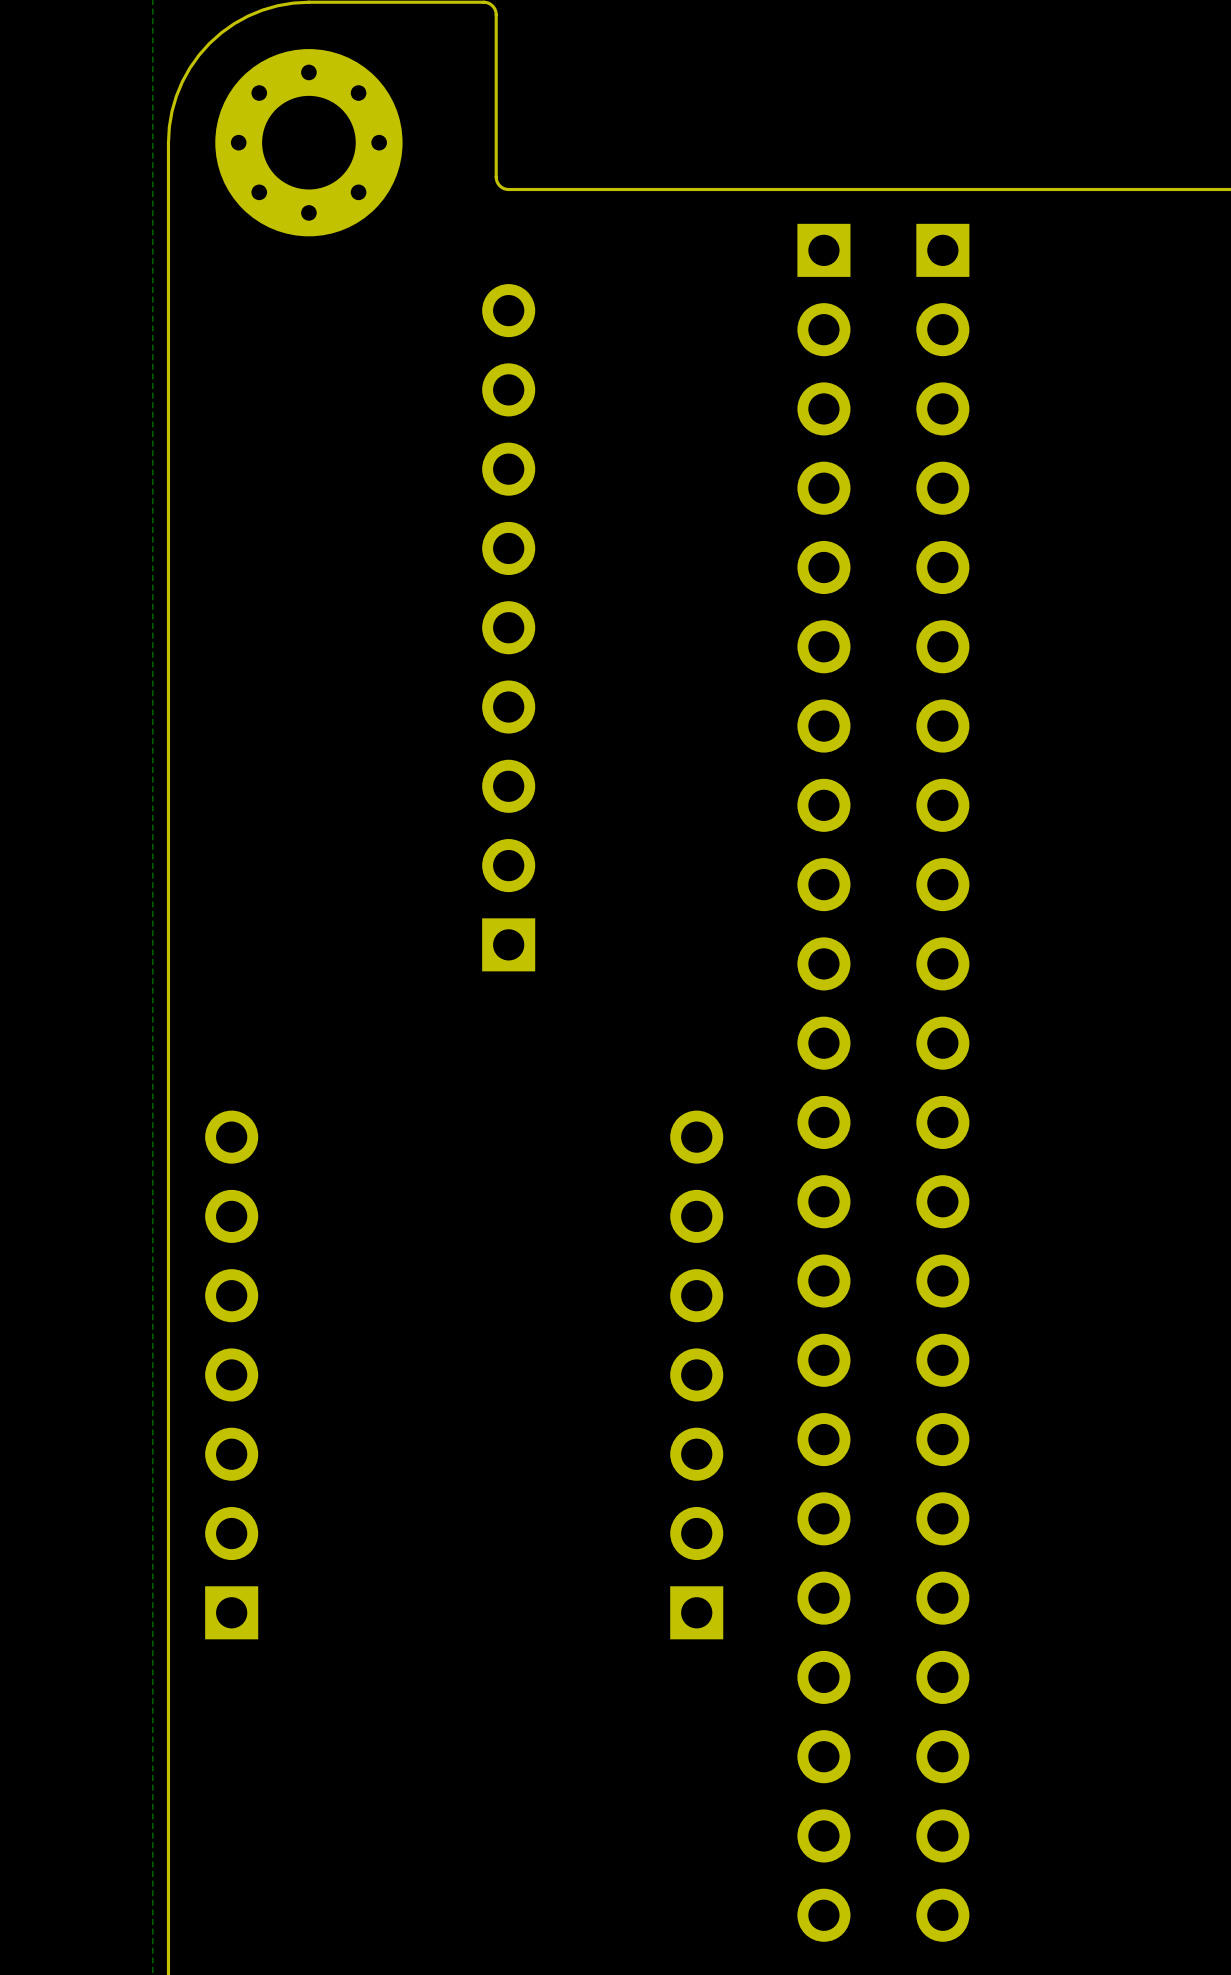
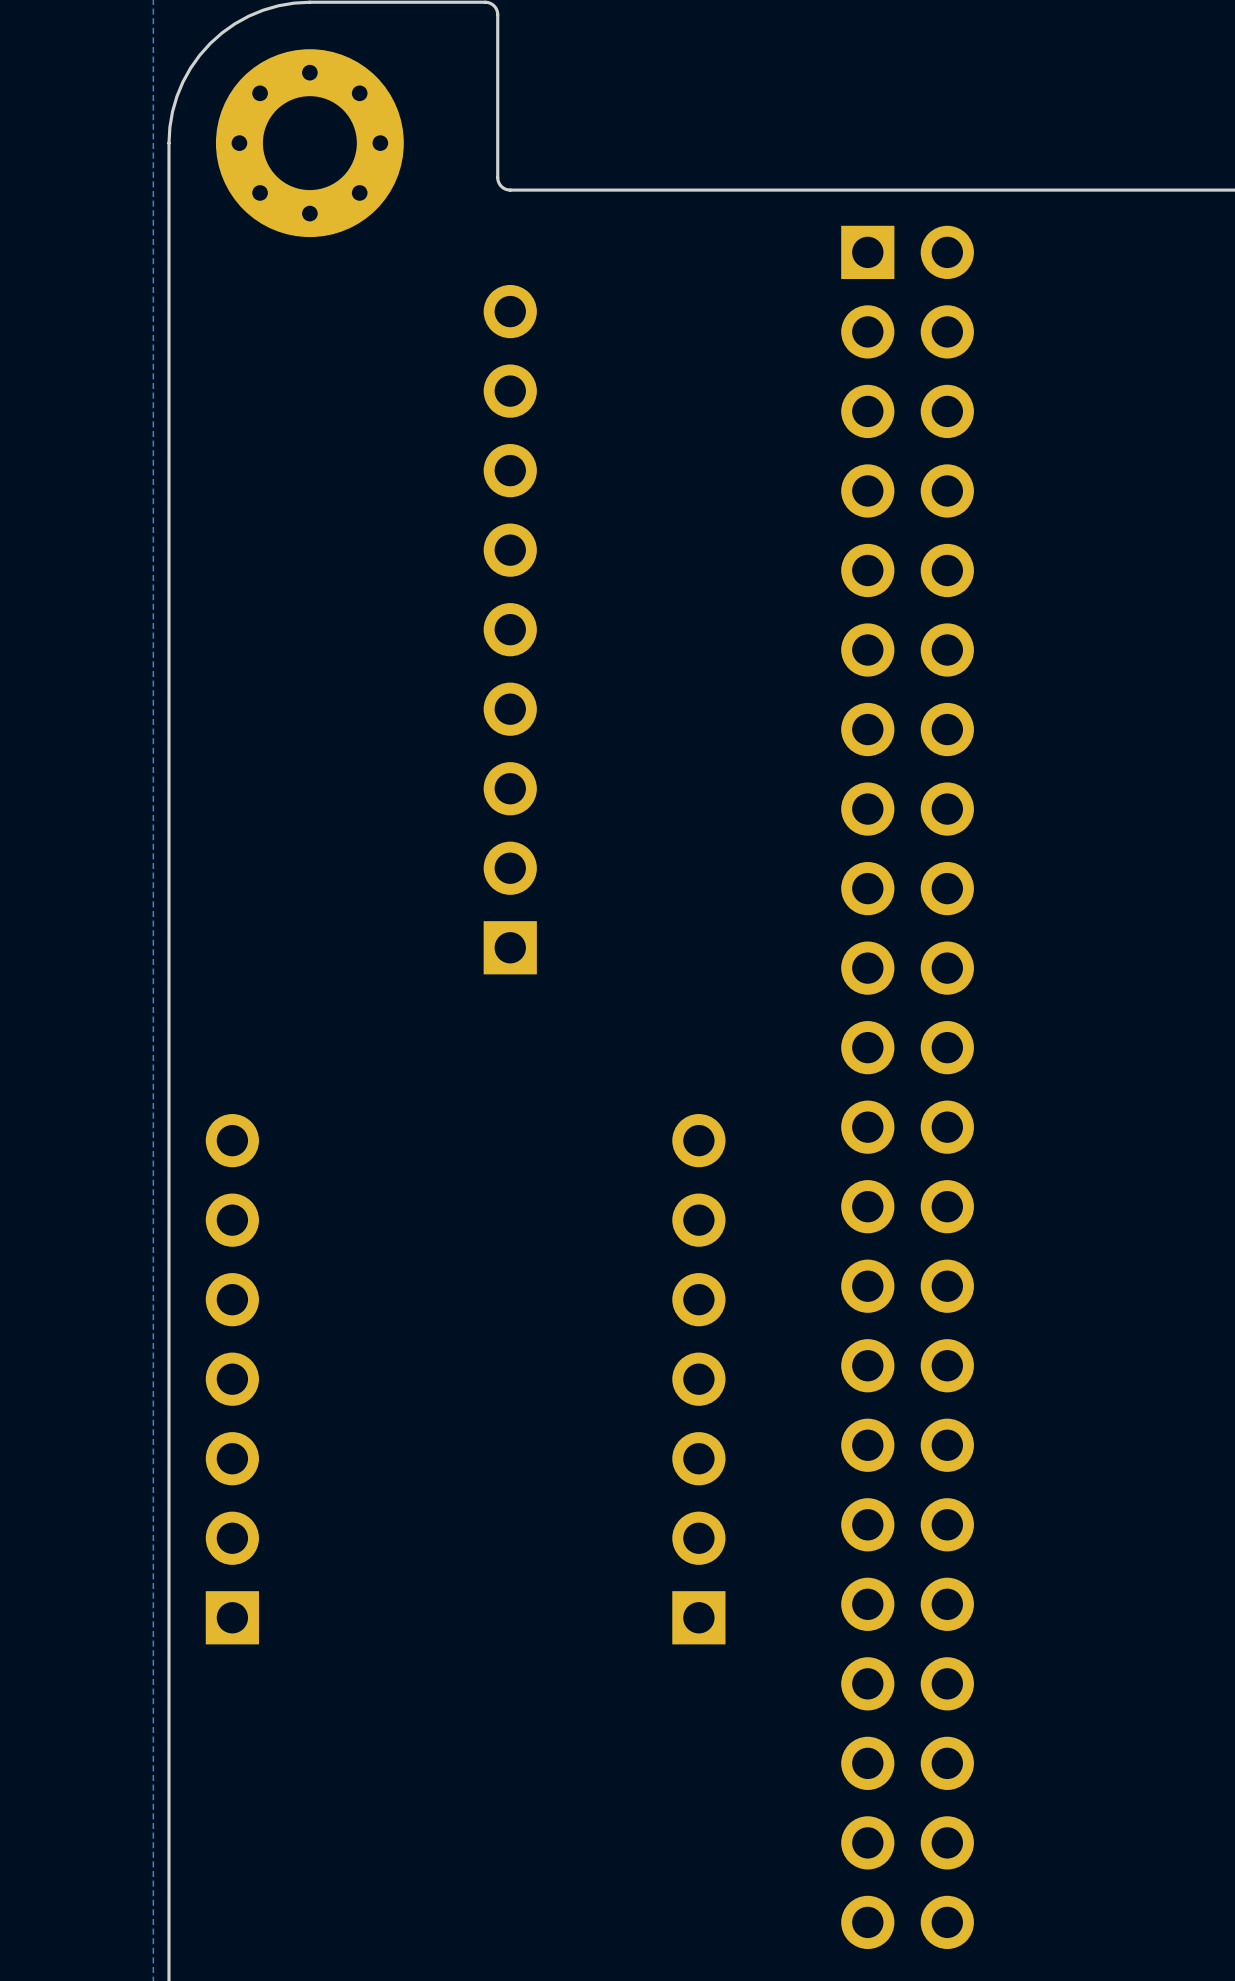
part: (823, 1082) -> none
part: (942, 1082) -> none
part: none -> (907, 1087)

